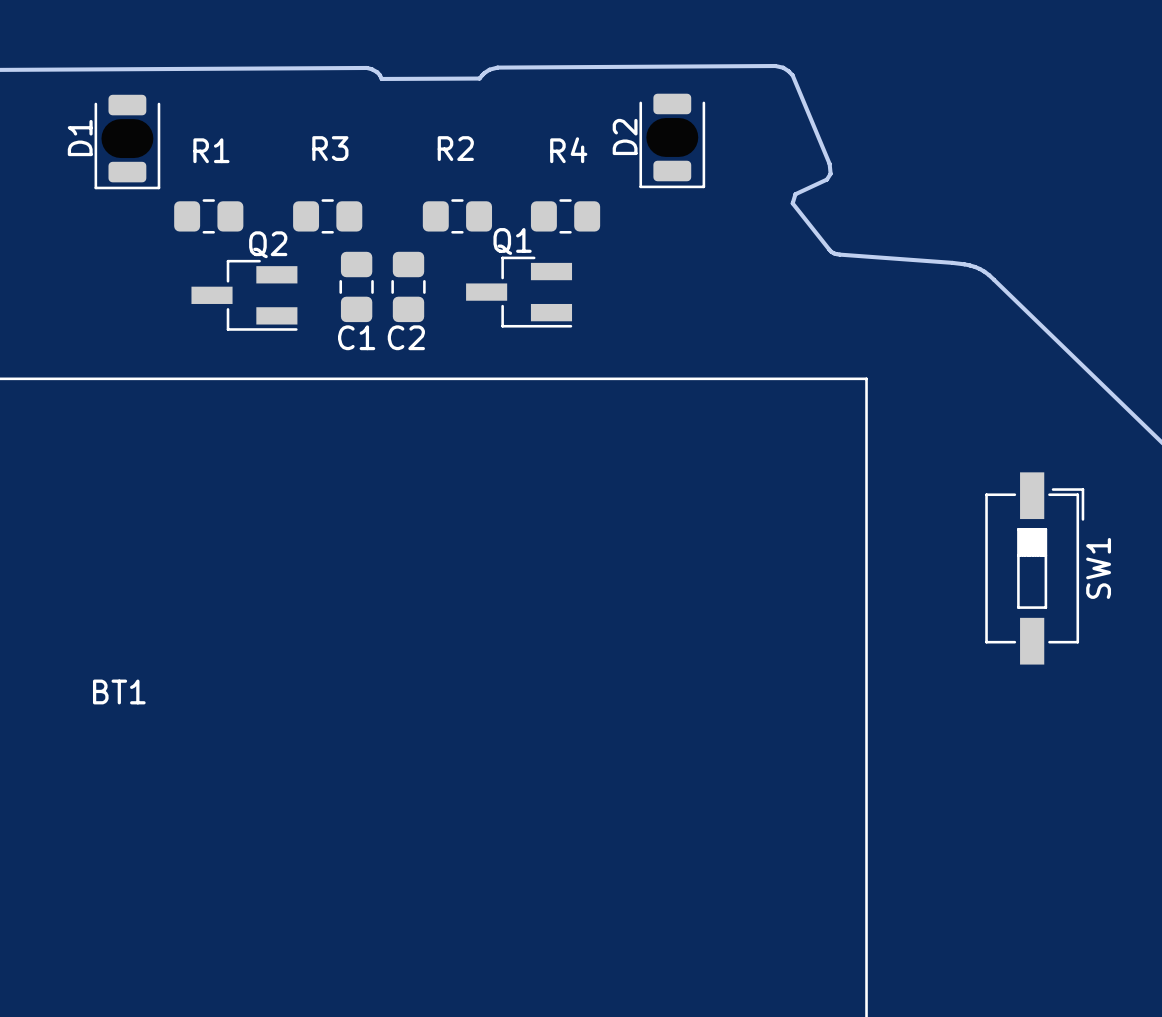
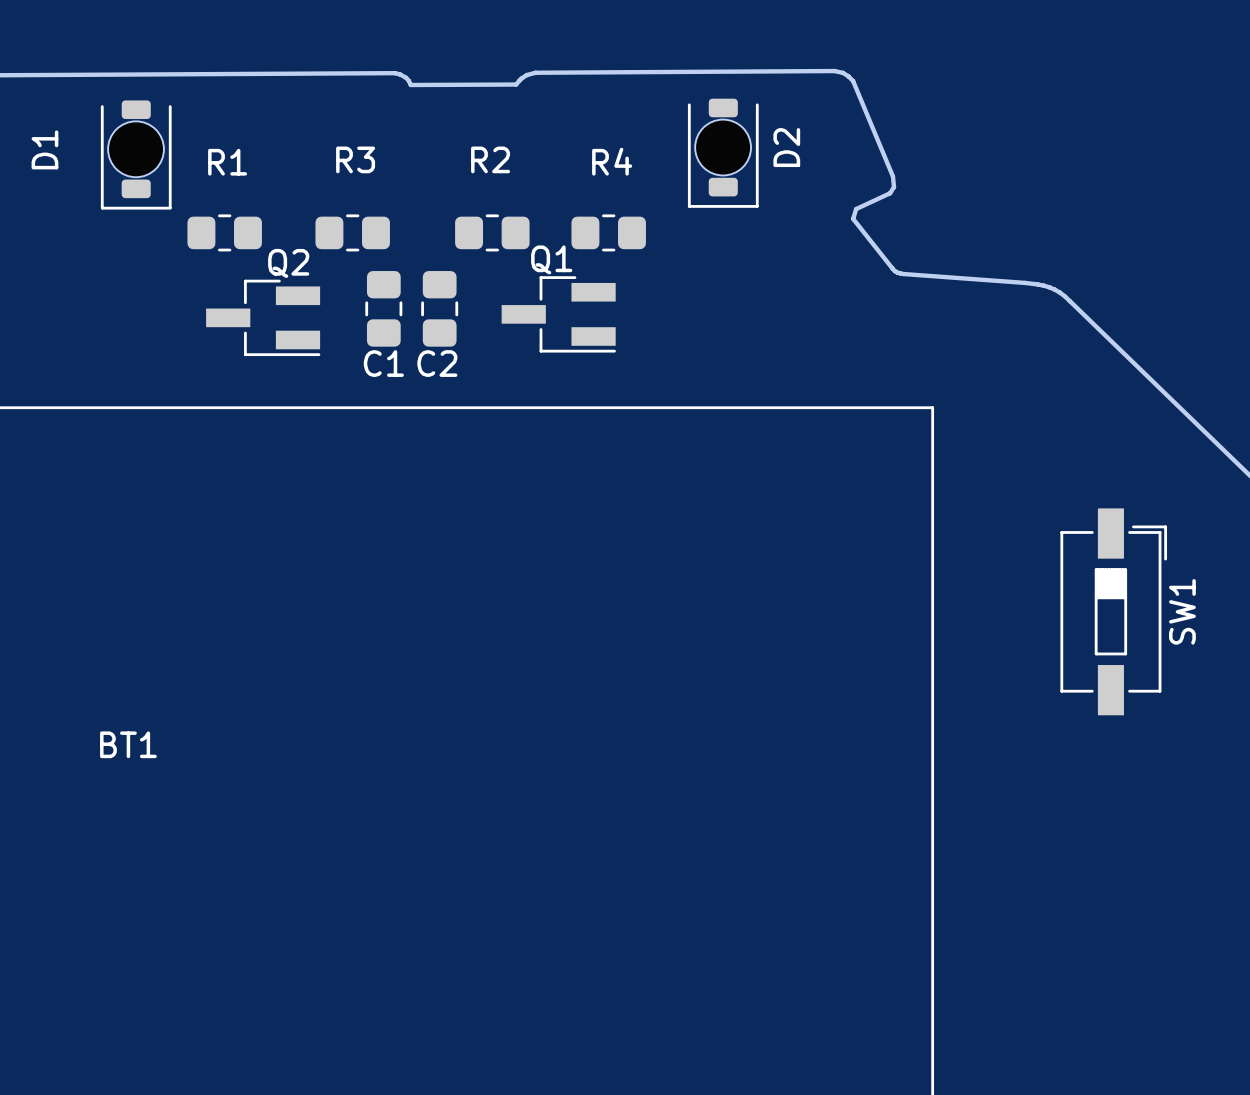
D2 footprint: [639, 93, 706, 189] -> [687, 98, 759, 208]
D1 footprint: [94, 94, 161, 190] -> [100, 100, 172, 210]
D2 name position: D2 (625, 136) -> D2 (786, 147)

